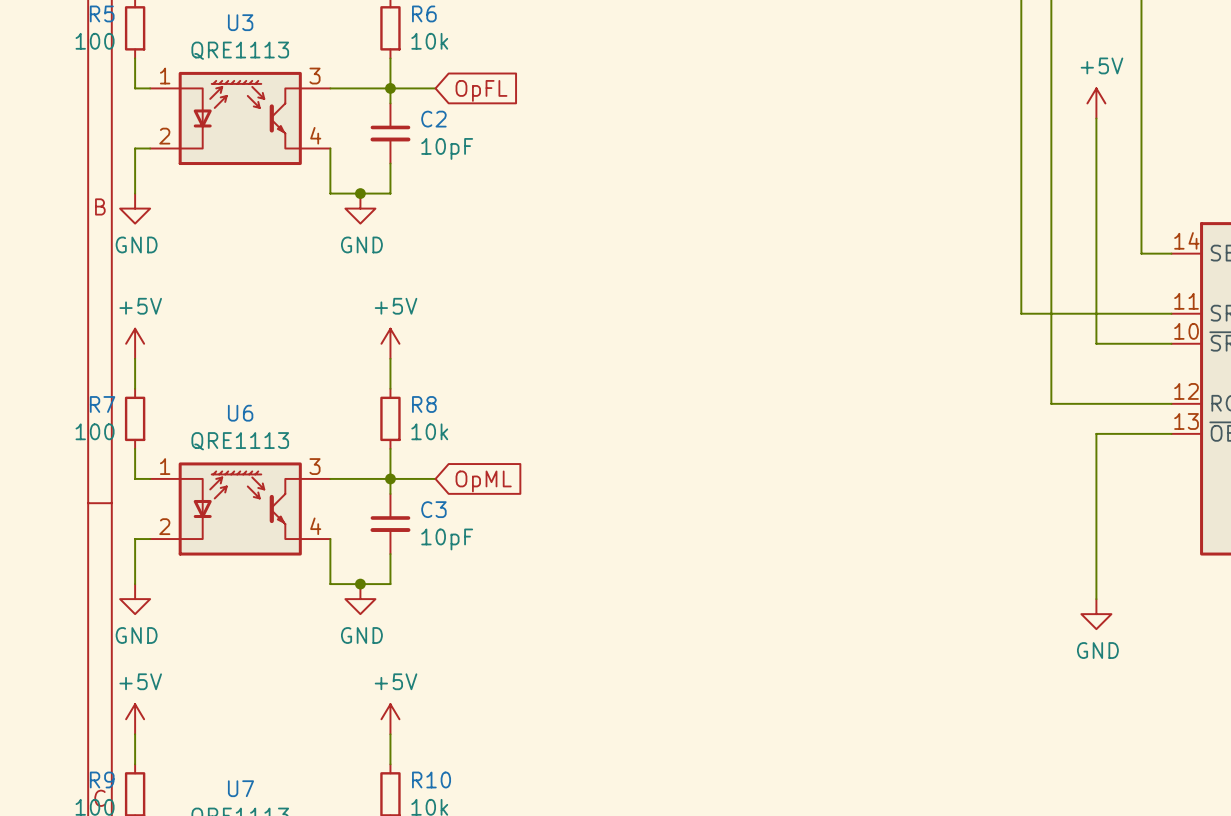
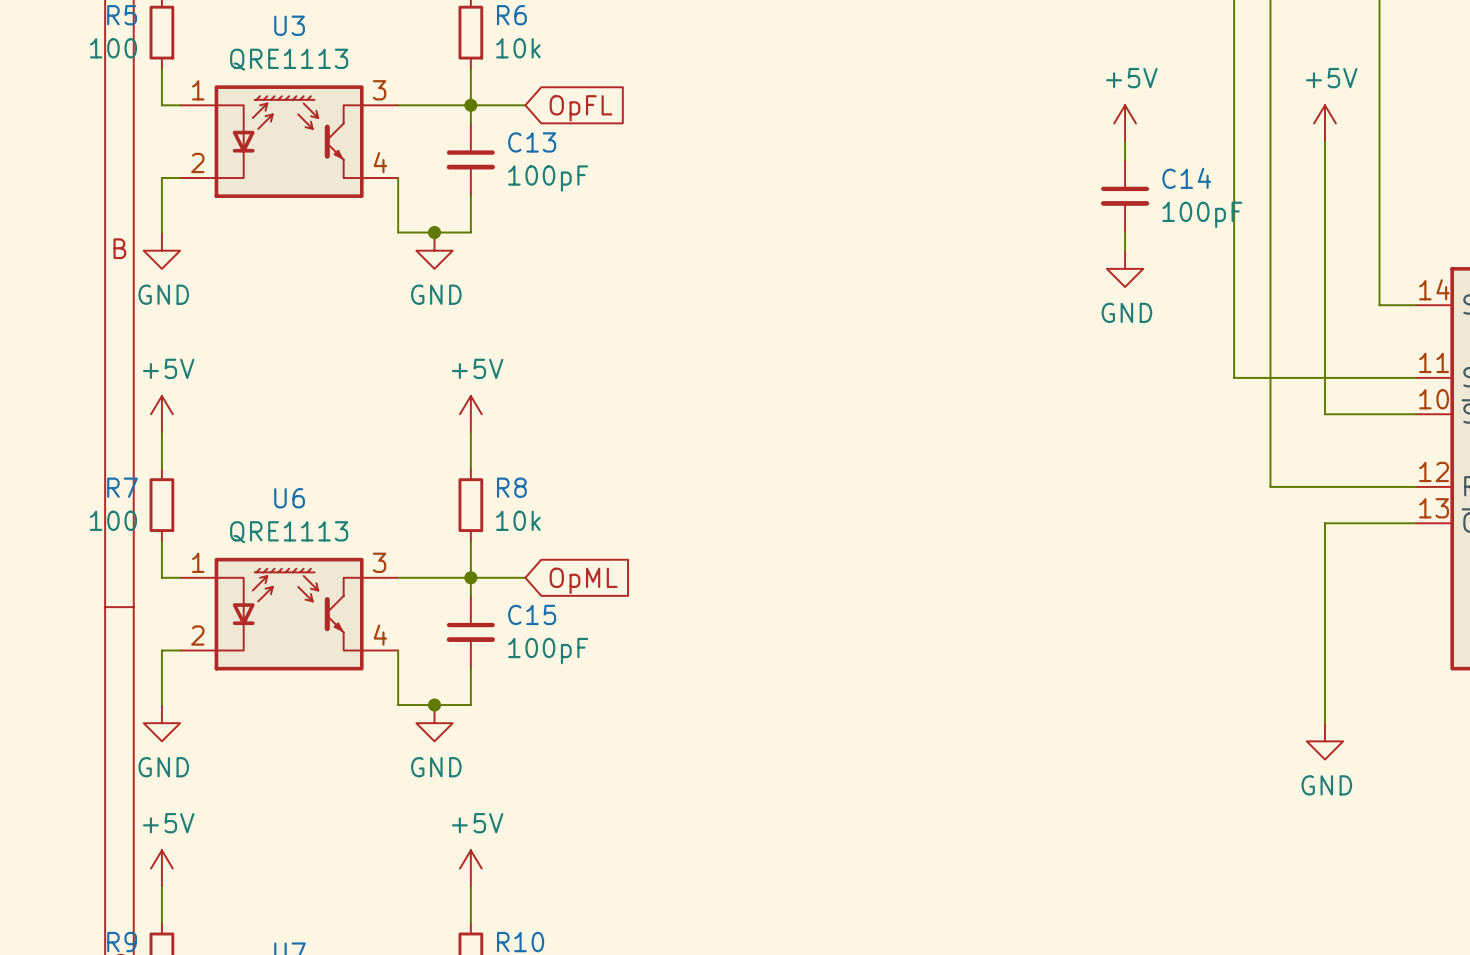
power symbol: none -> +5V (1125, 123)
wire: none -> (1125, 141) (1125, 159)
C2 name: C2 (433, 119) -> C13 (532, 142)
C2 value: 10pF (447, 148) -> 100pF (548, 178)
C14: none -> 100pF (1125, 196)
wire: none -> (1125, 232) (1125, 250)
power symbol: none -> GND (1125, 268)
C3 name: C3 (433, 509) -> C15 (532, 614)
C3 value: 10pF (447, 539) -> 100pF (548, 651)

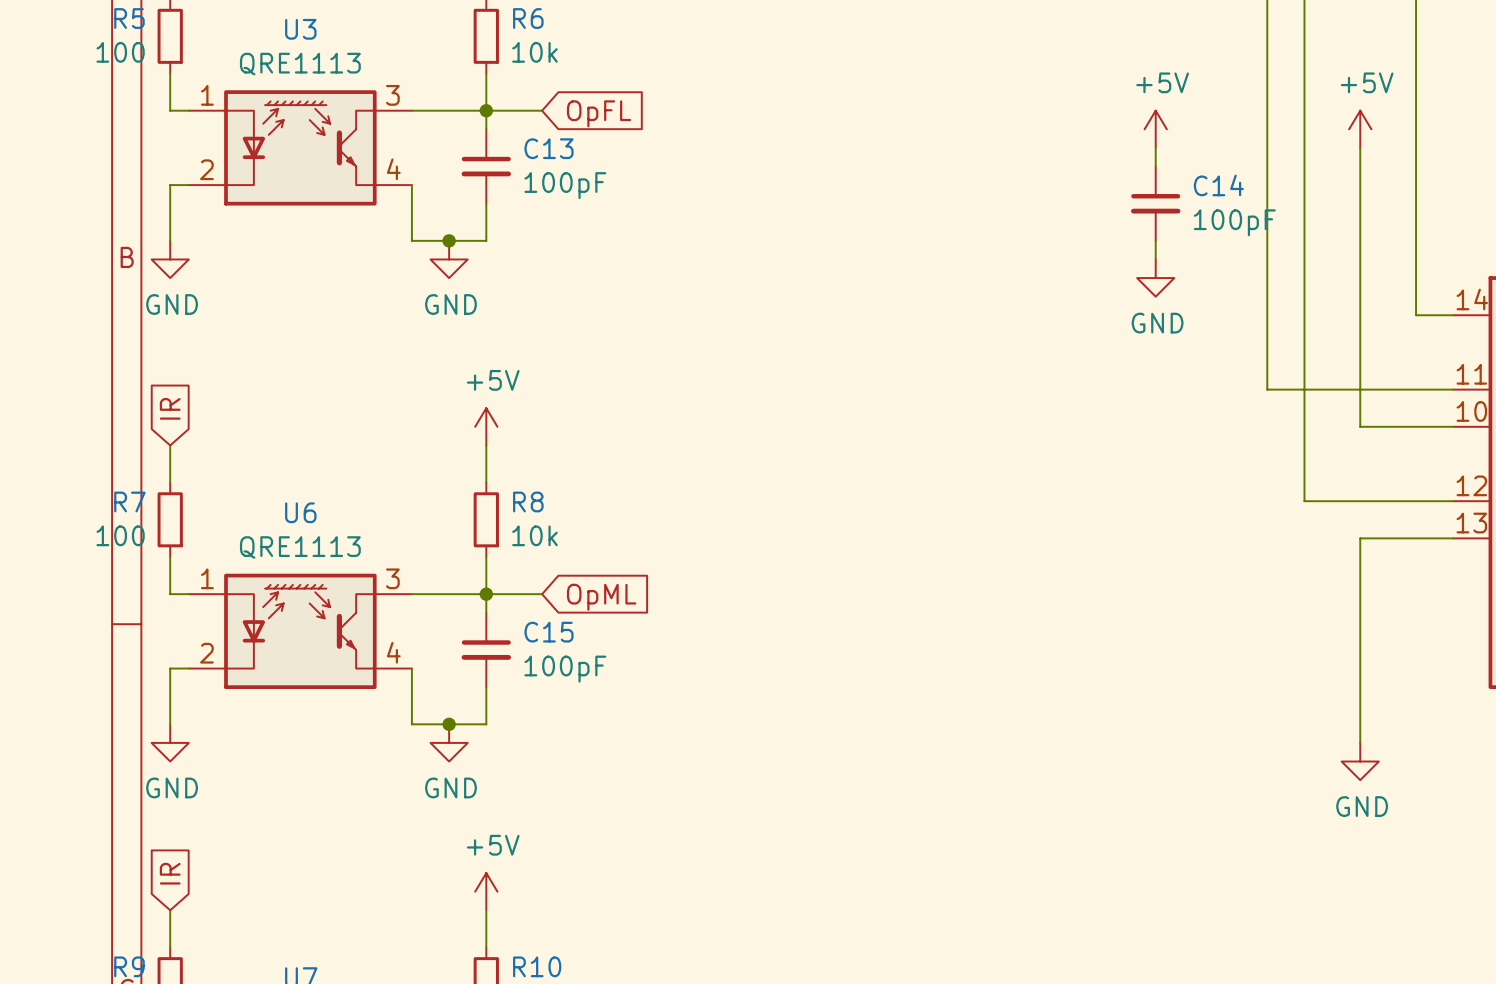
global label: none -> IR (170, 408)
power symbol: +5V (161, 414) -> none
global label: none -> IR (170, 873)
power symbol: +5V (161, 868) -> none

